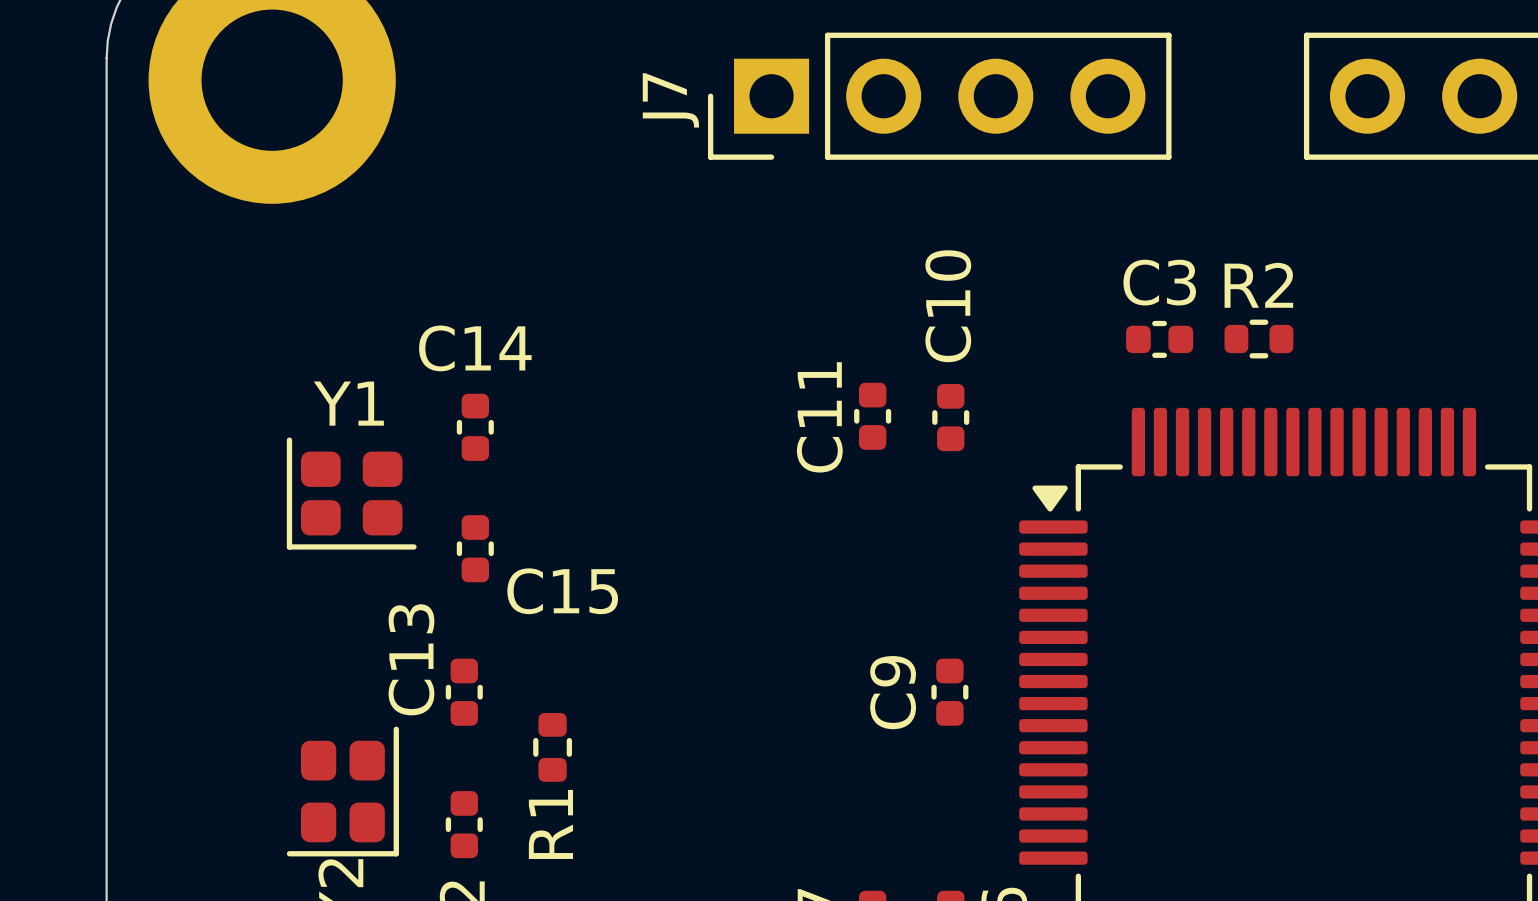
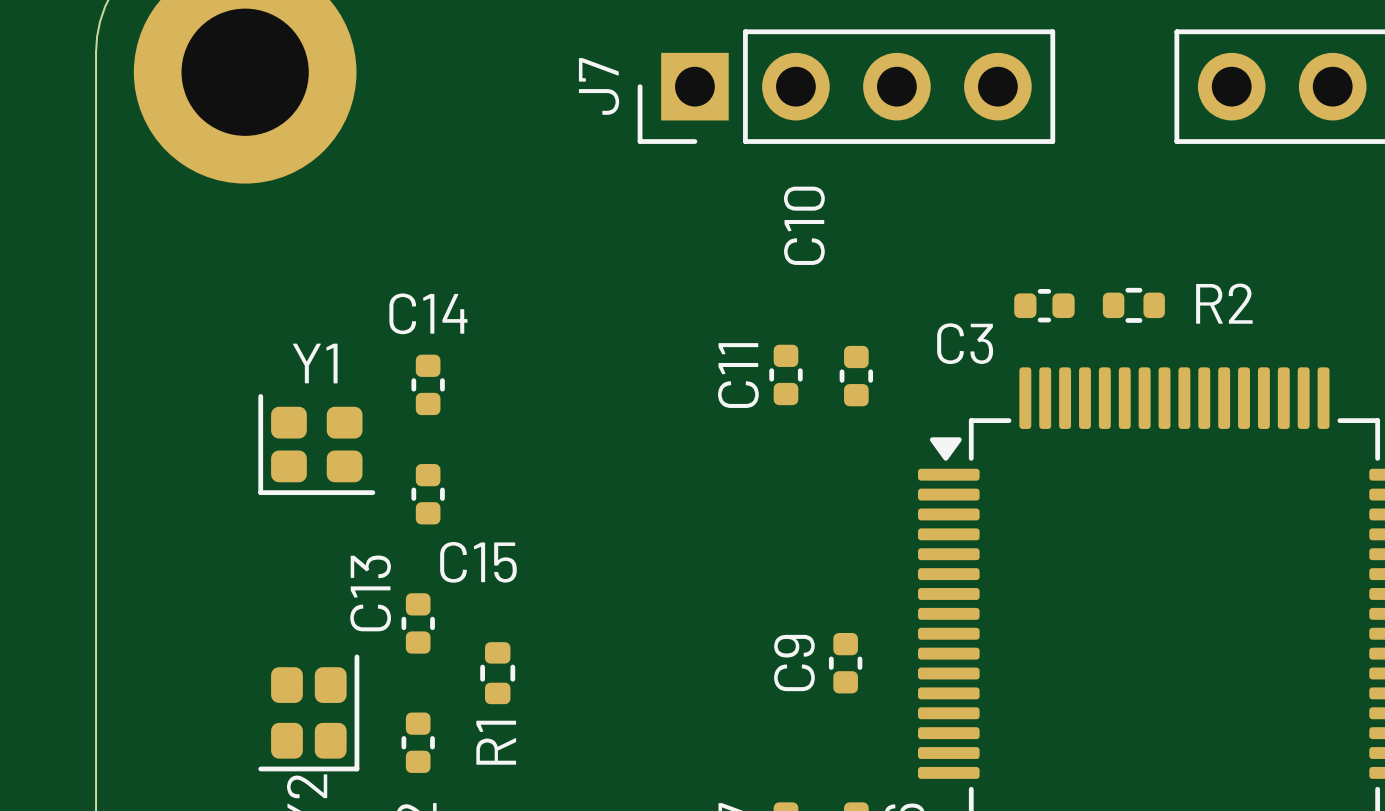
C3 name position: C3 (1159, 282) -> C3 (965, 343)
R2 name position: R2 (1258, 285) -> R2 (1224, 303)
C10 name position: C10 (948, 306) -> C10 (804, 225)
C15 name position: C15 (562, 591) -> C15 (478, 562)
C9 position: (949, 692) -> (845, 663)

